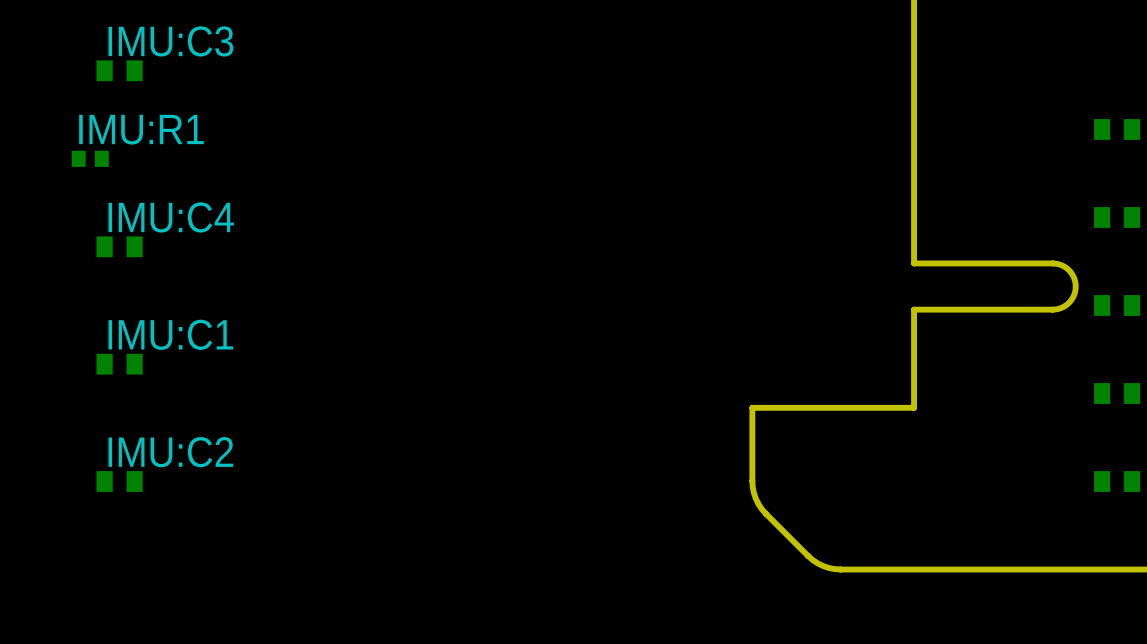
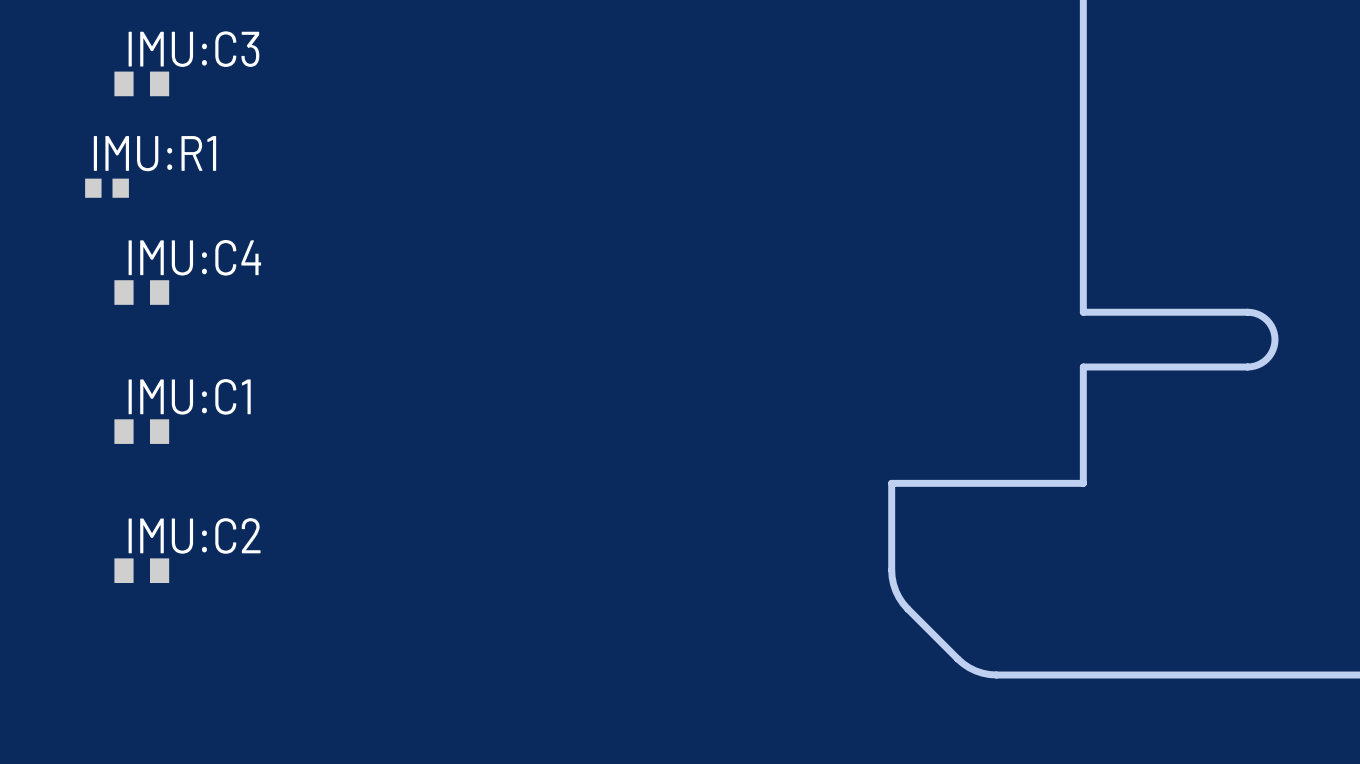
part: (1117, 129) -> none
part: (1117, 217) -> none
part: (1117, 305) -> none
part: (1117, 393) -> none
part: (1117, 481) -> none

